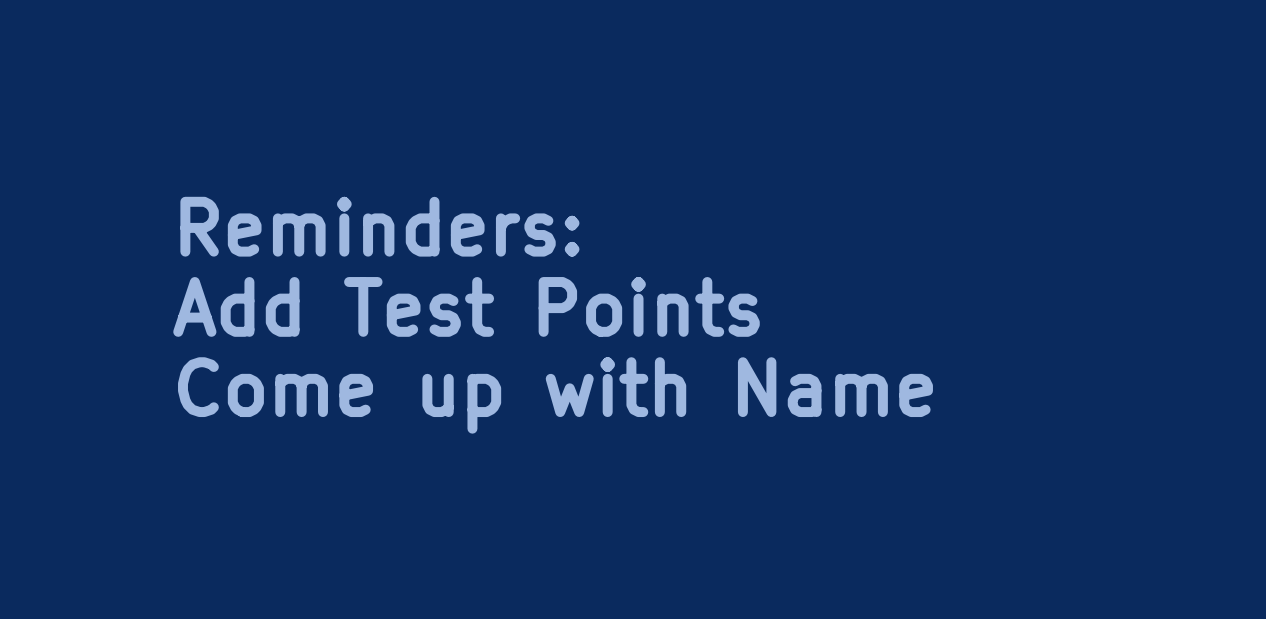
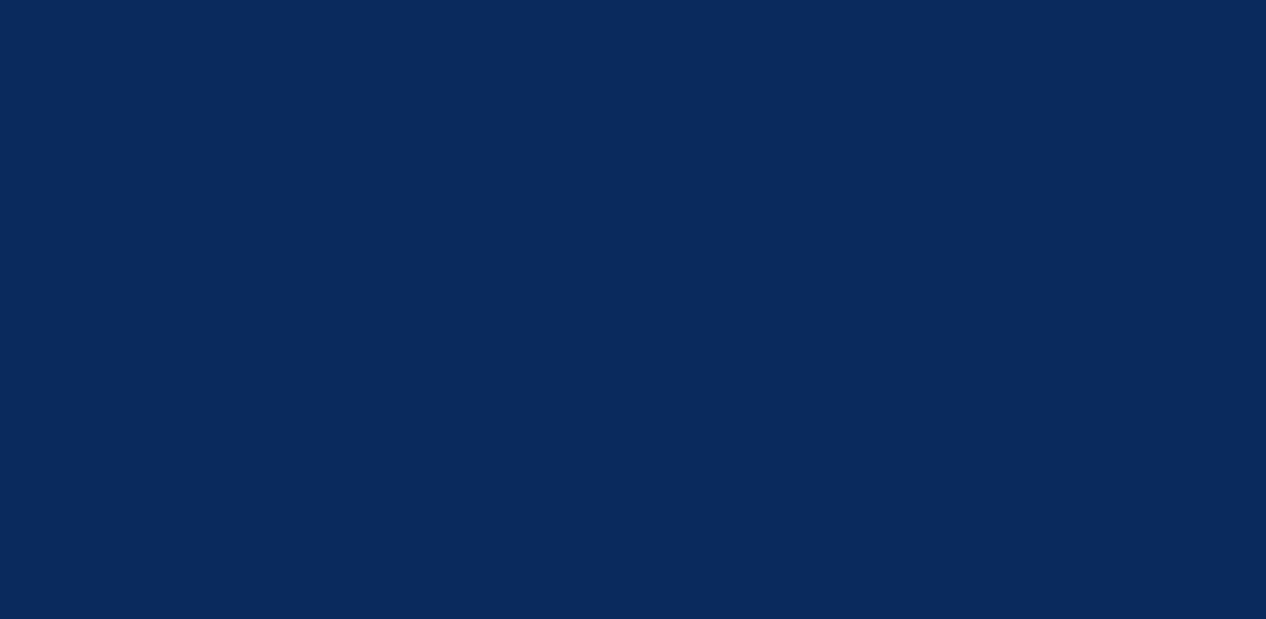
text: Reminders: (379, 226) -> none
text: Add Test Points (466, 306) -> none
text: Come up with Name (555, 395) -> none

